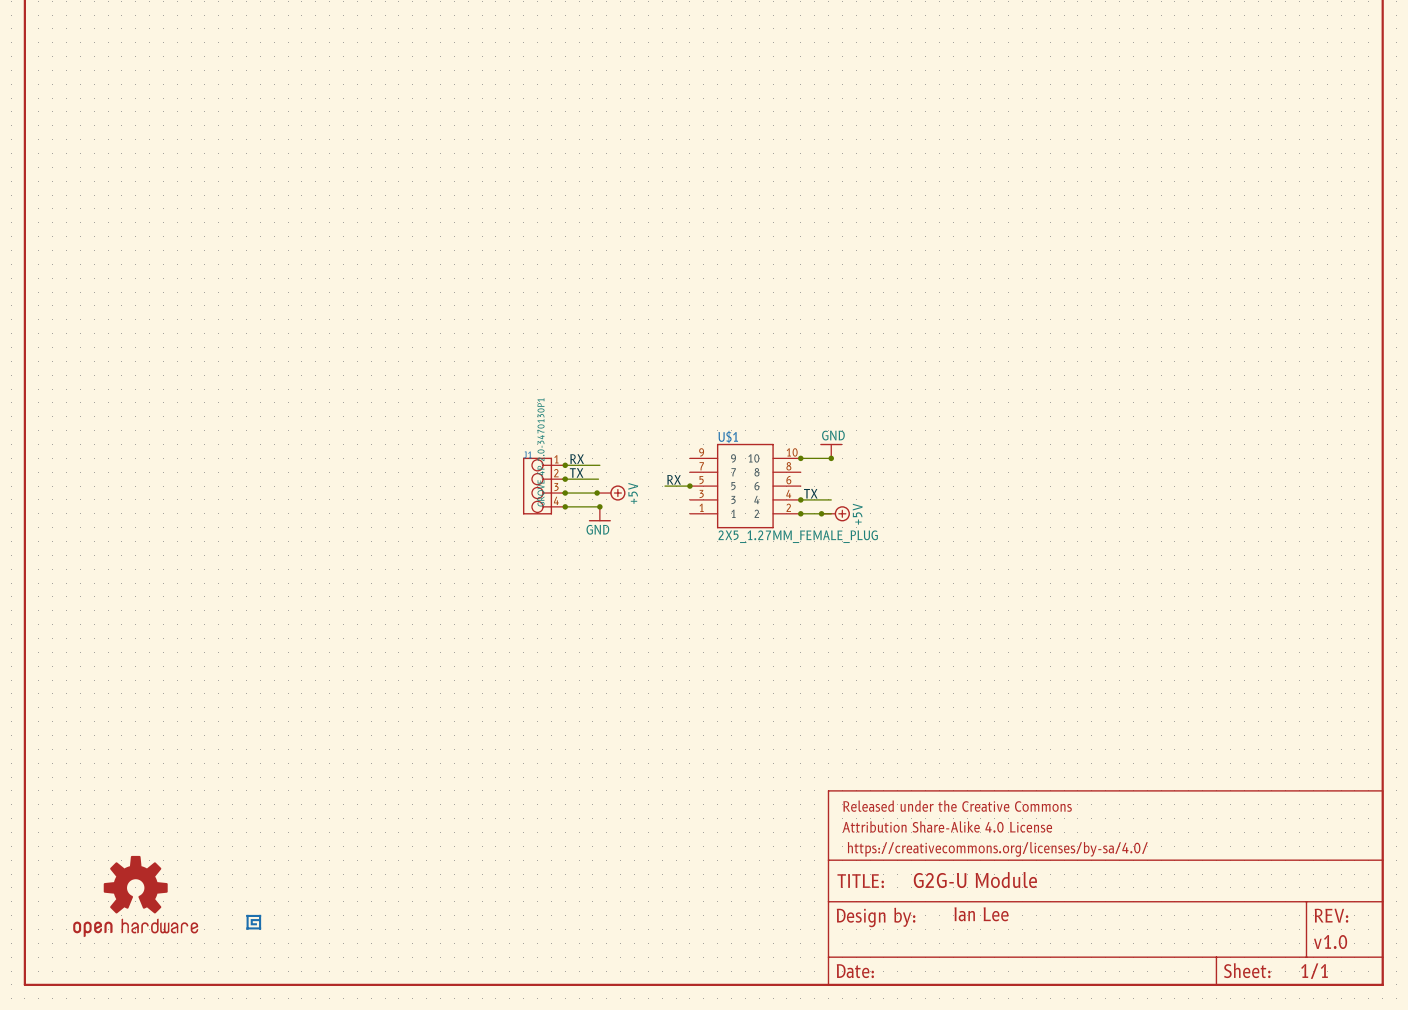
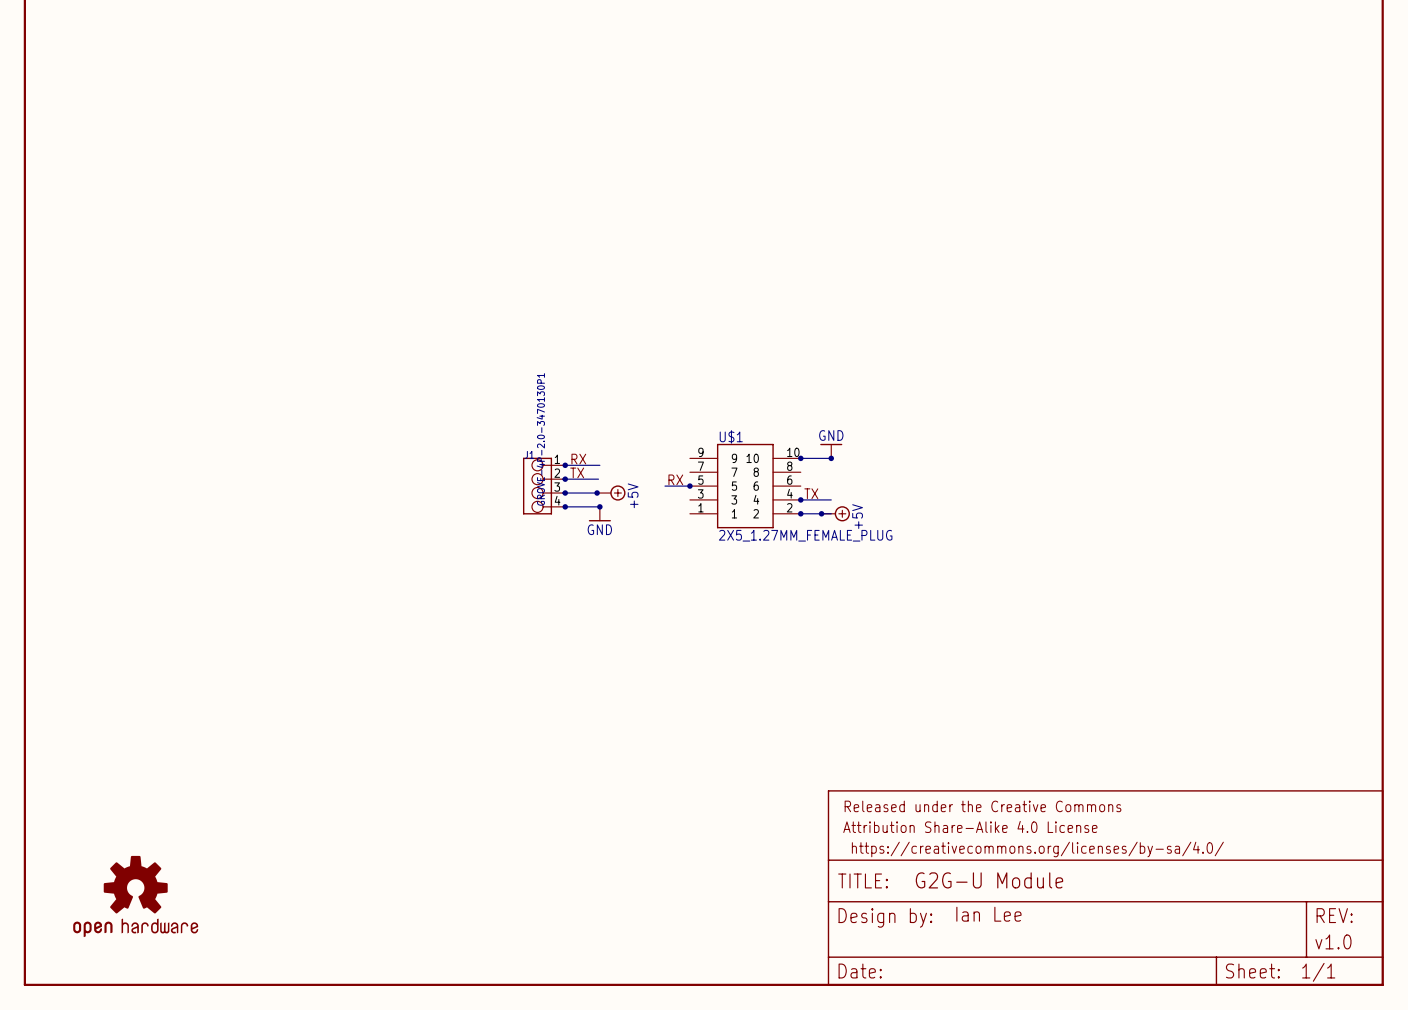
part: (253, 922) -> none

